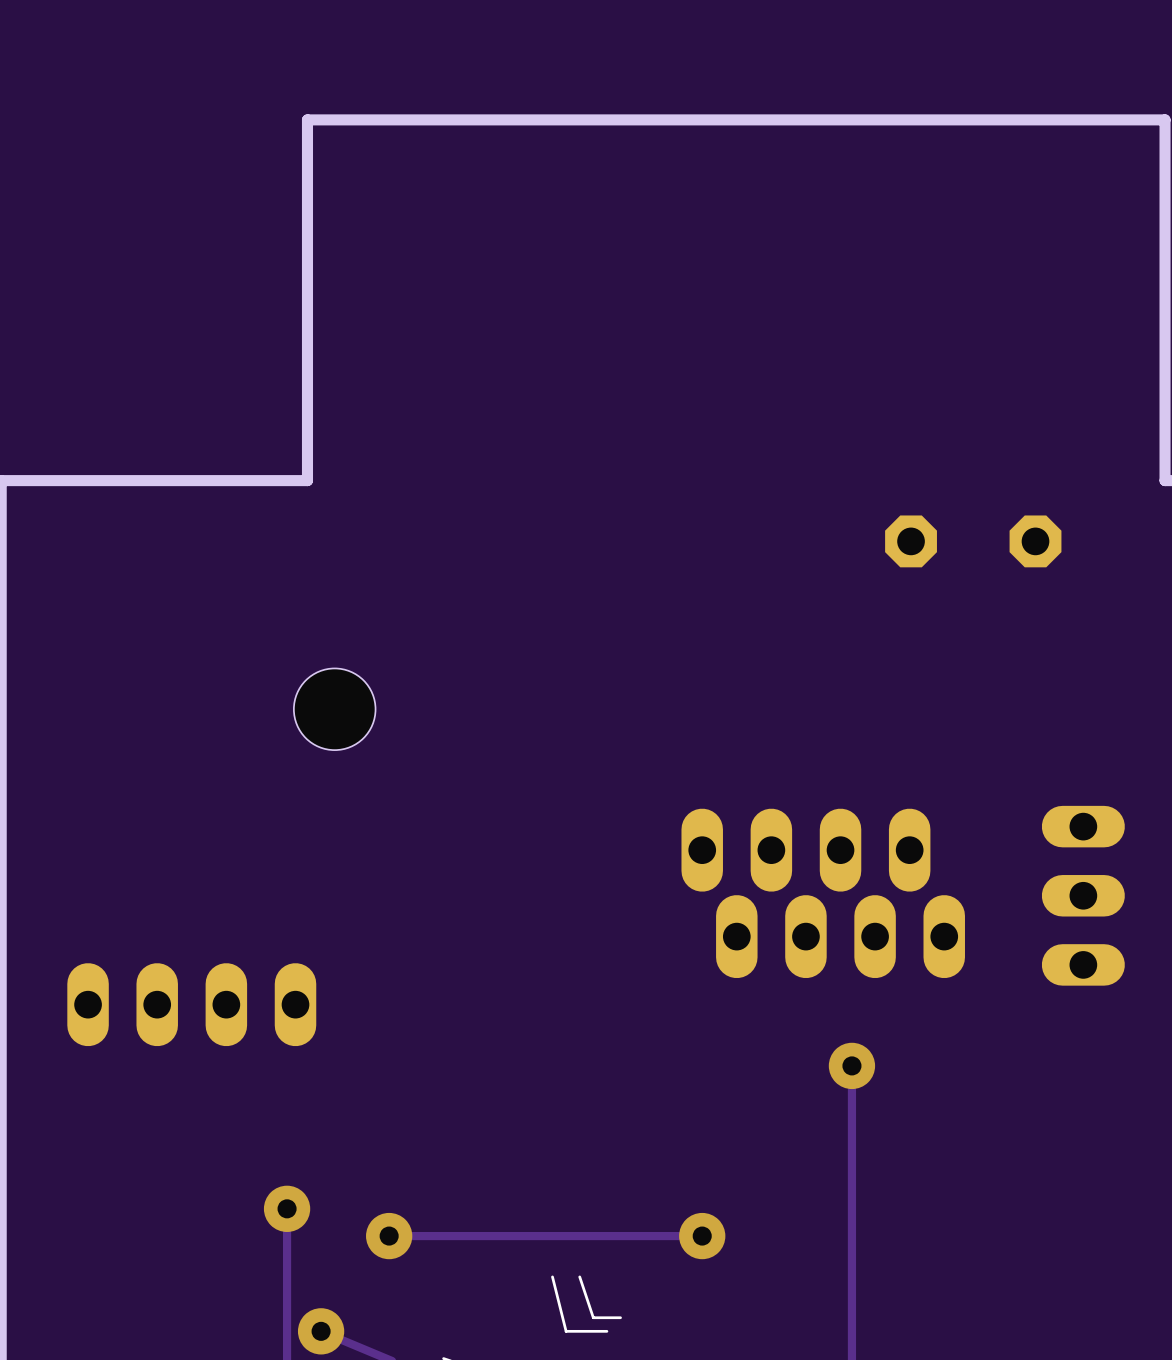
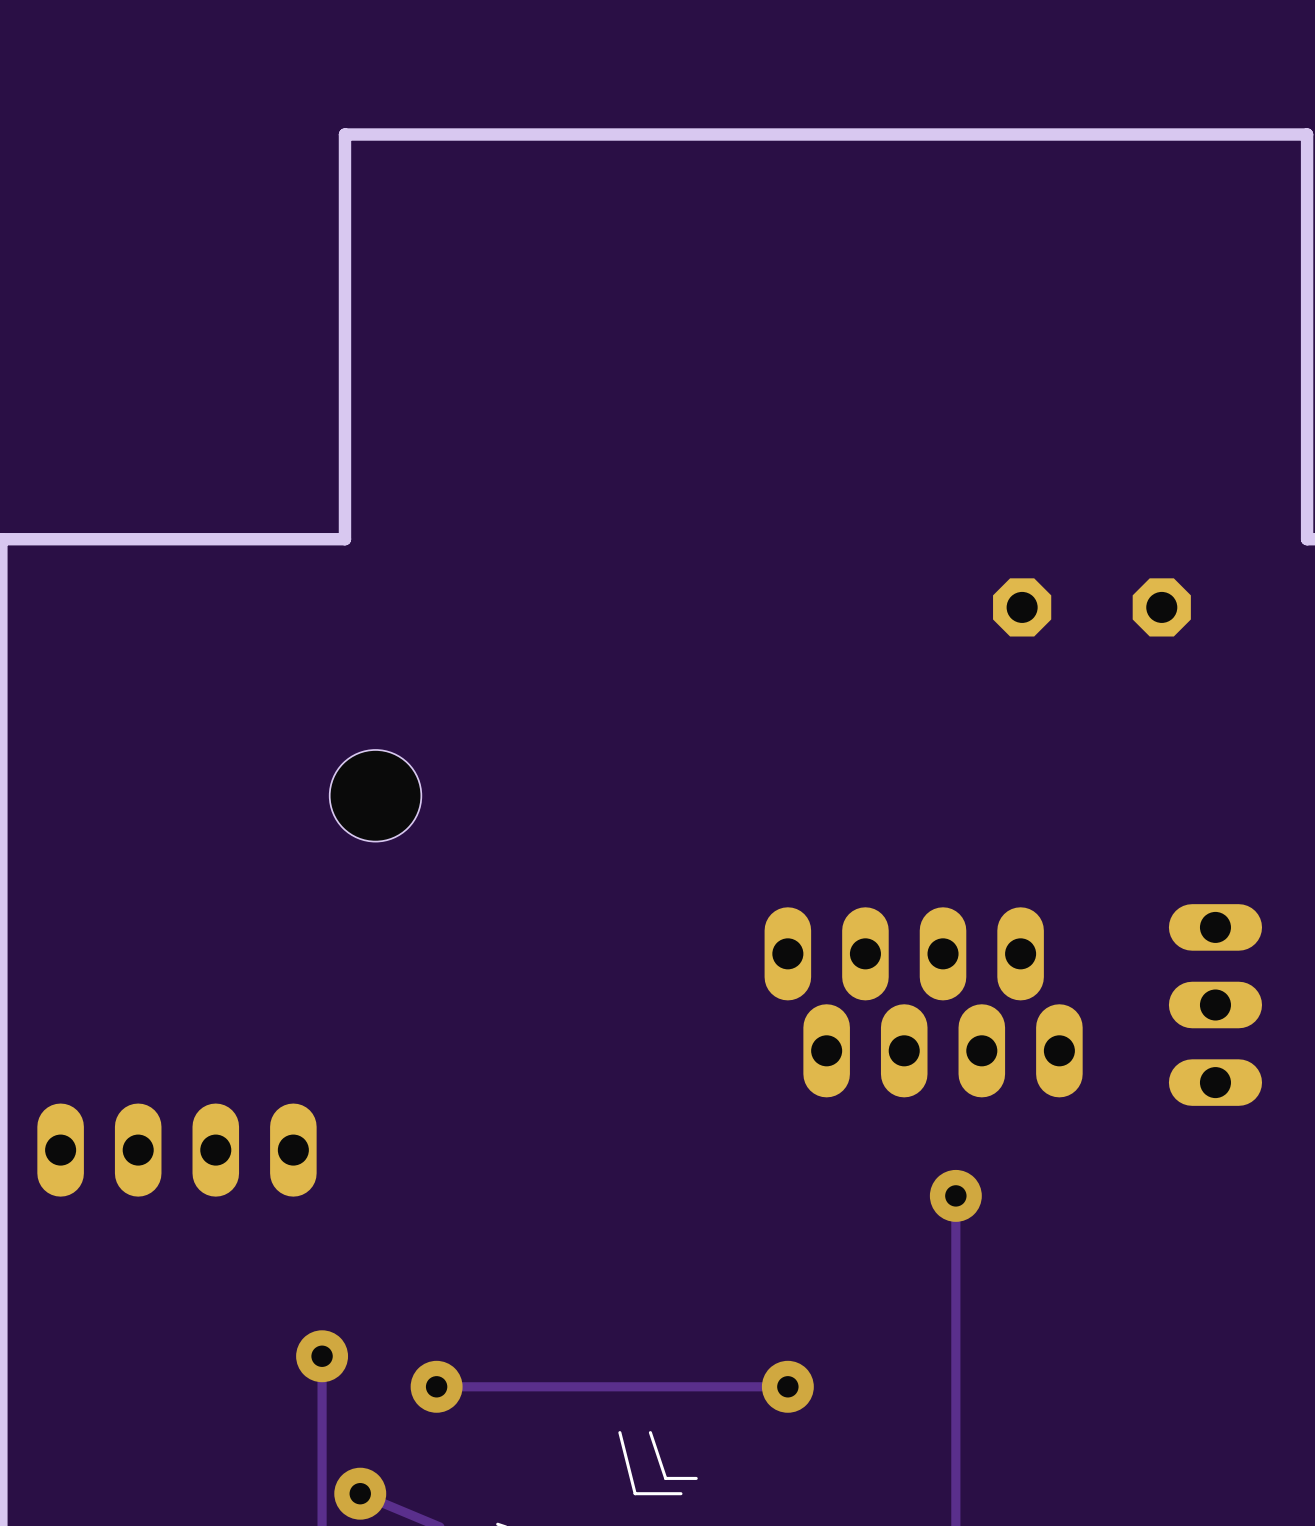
part position: (191, 1004) -> (176, 1150)

